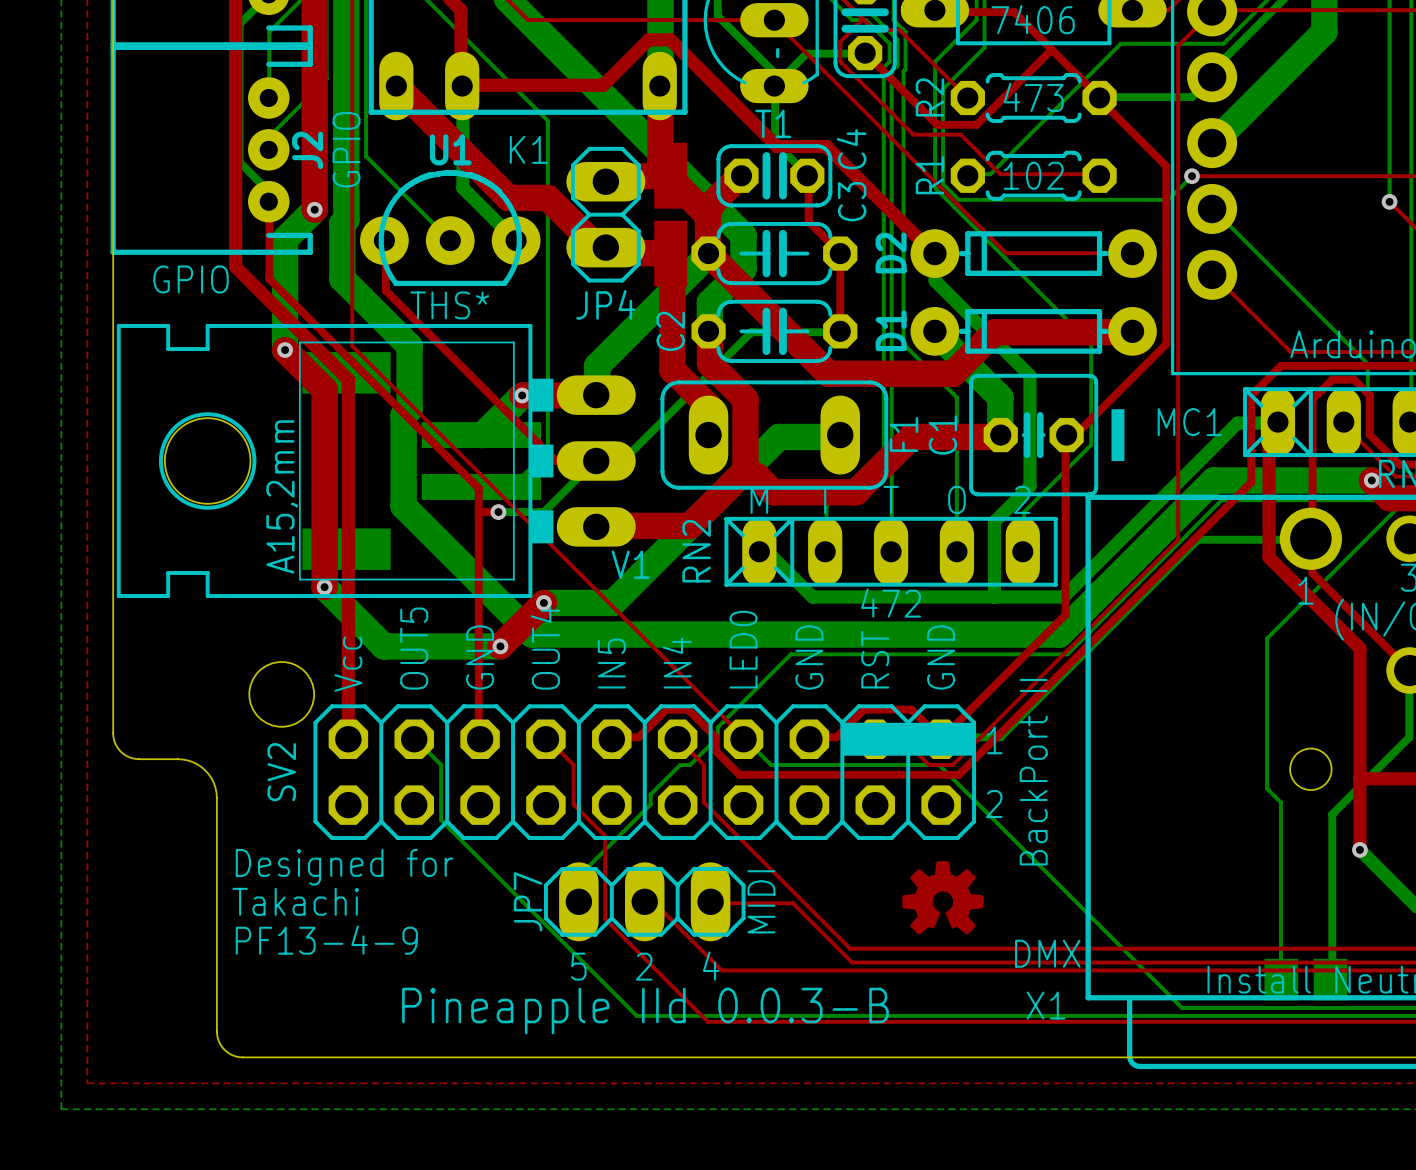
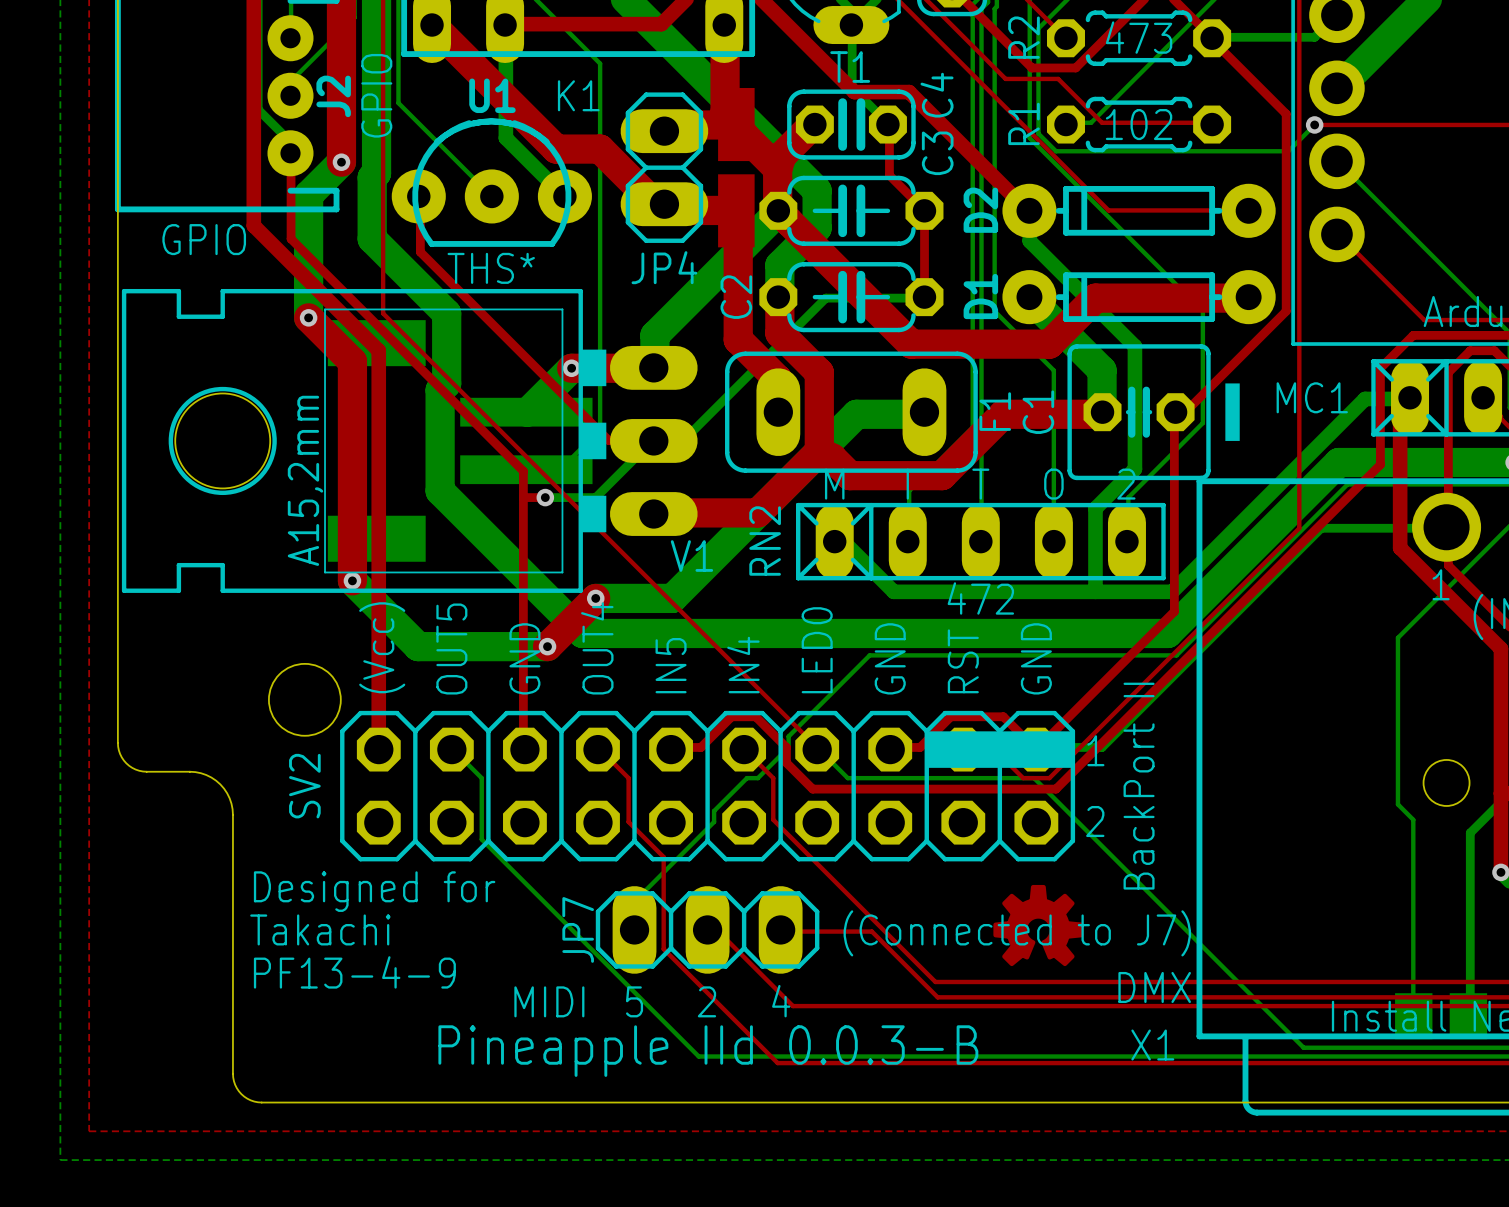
text: Vcc (348, 664) -> (Vcc) (382, 647)
text: MIDI (761, 901) -> (Connected to J7) (1017, 933)
text: none -> MIDI (549, 1001)

